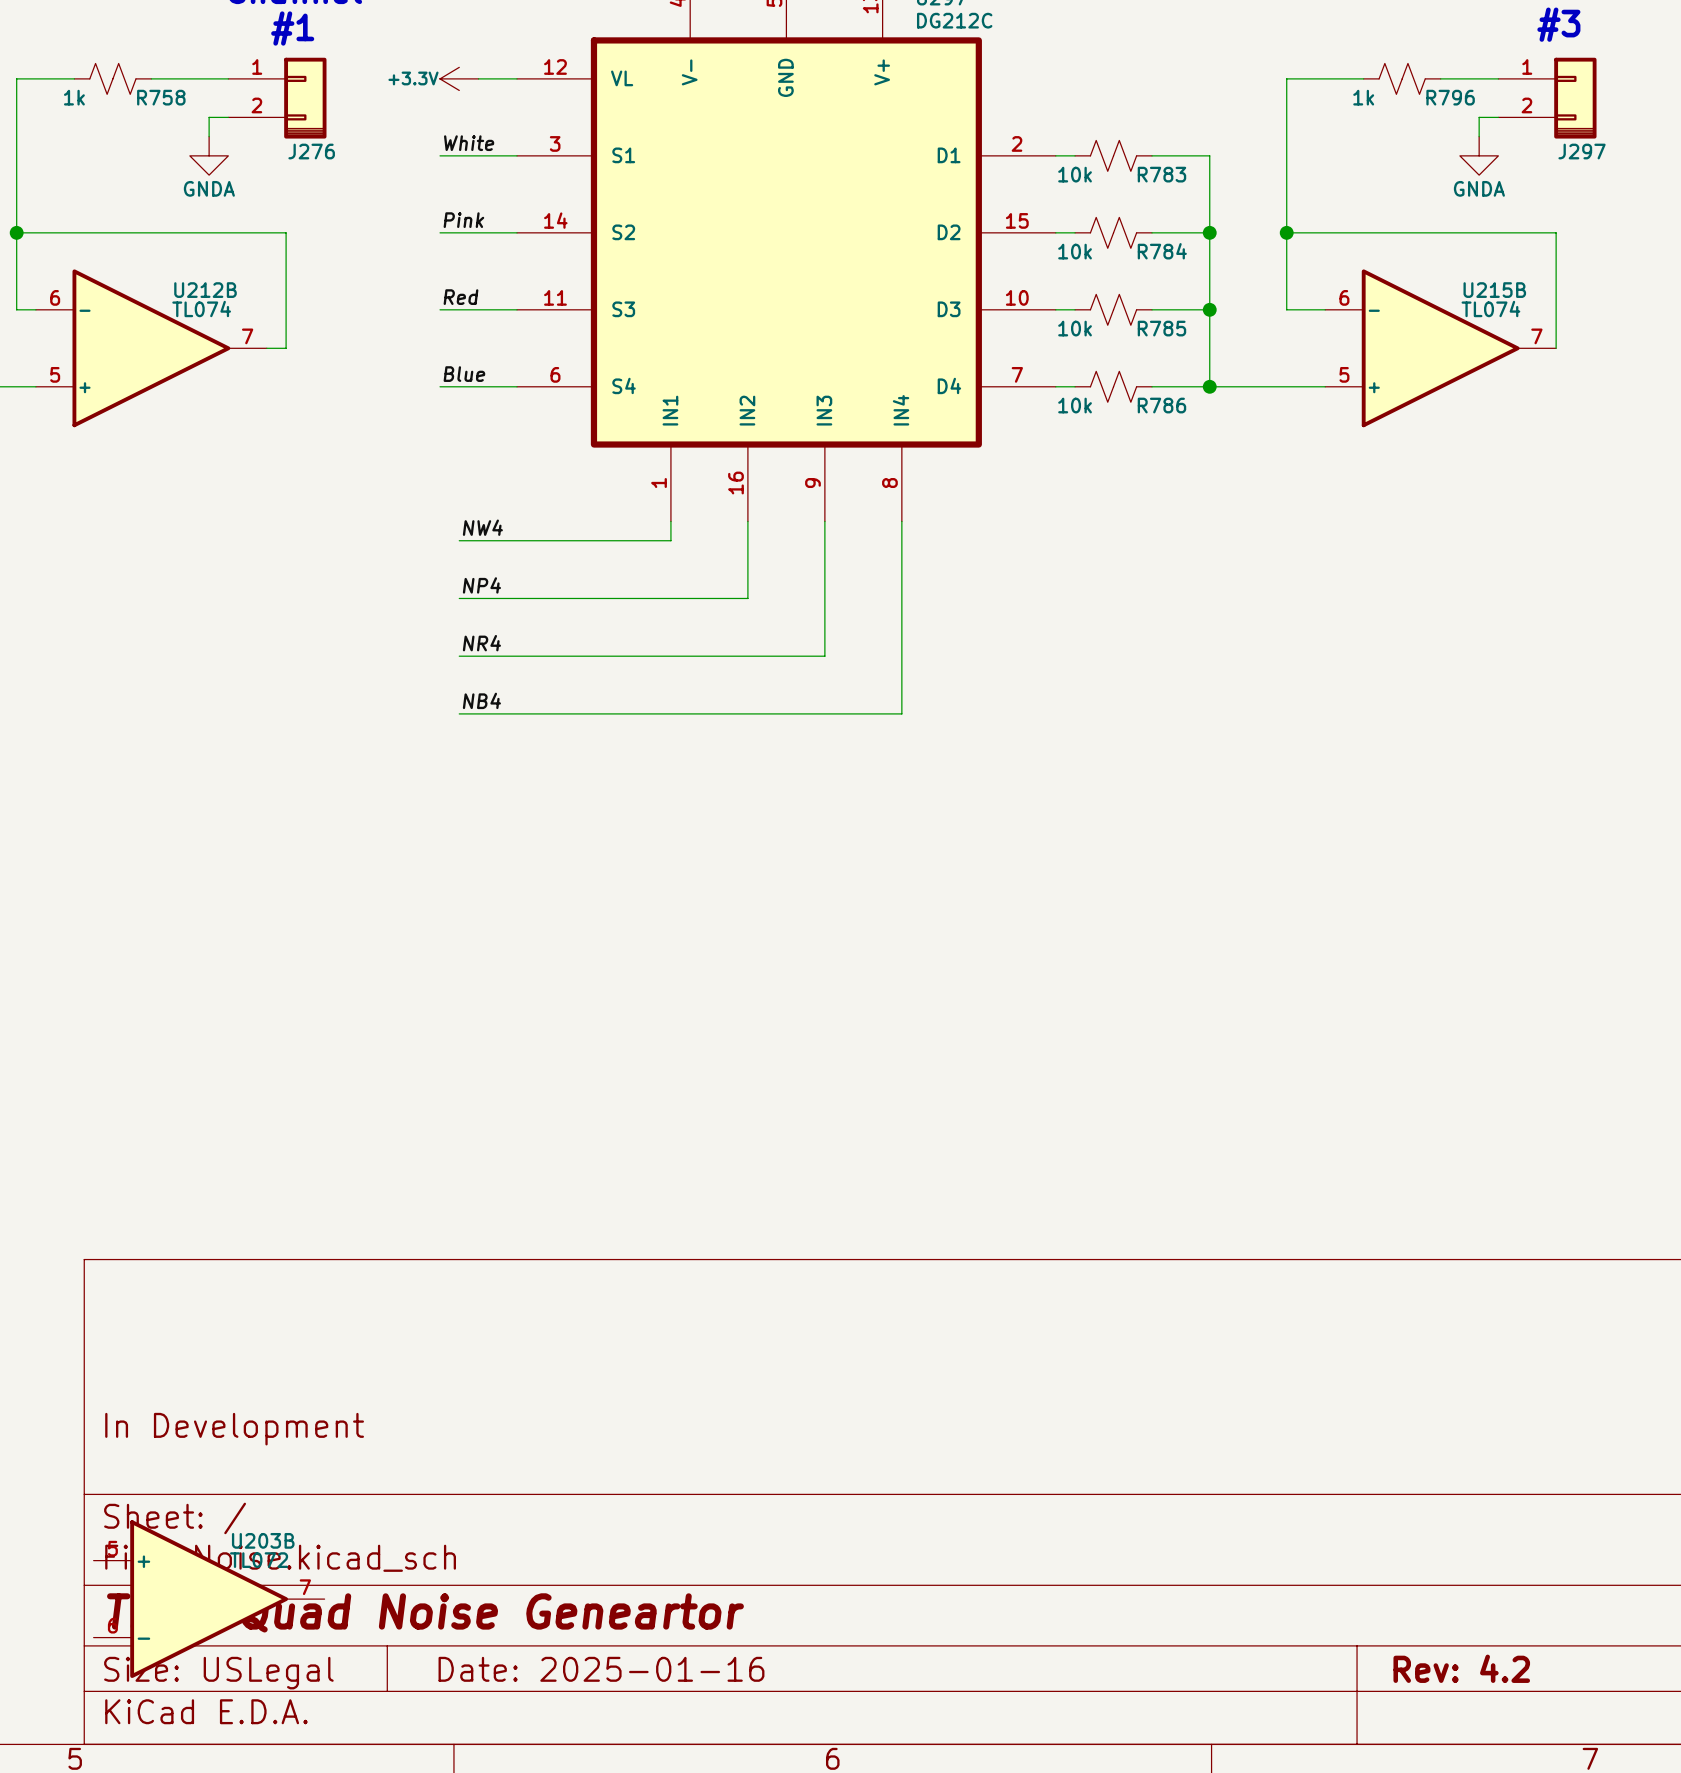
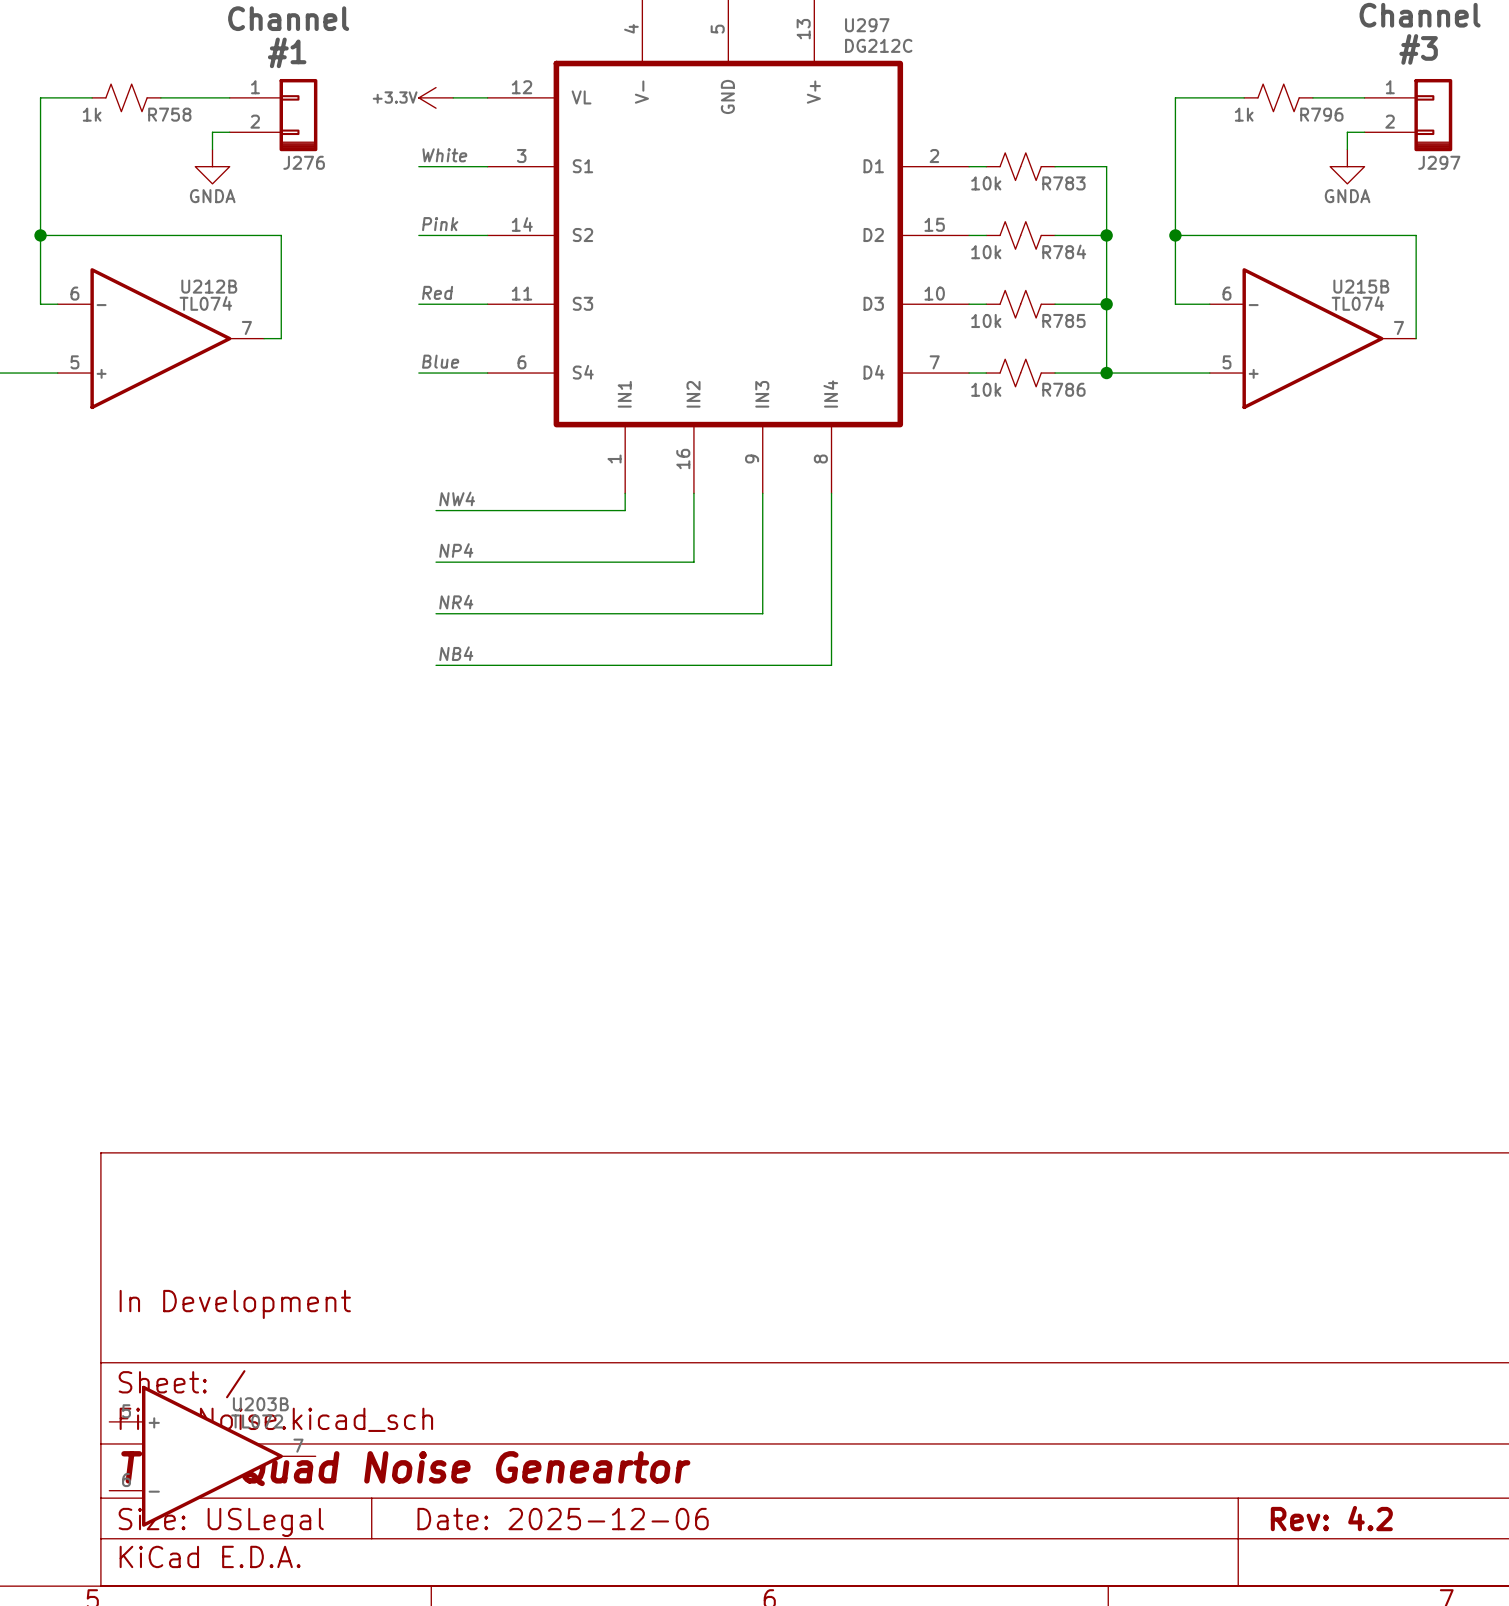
title block: Date: 2025-01-16 (601, 1669) -> Date: 2025-12-06 (563, 1519)

